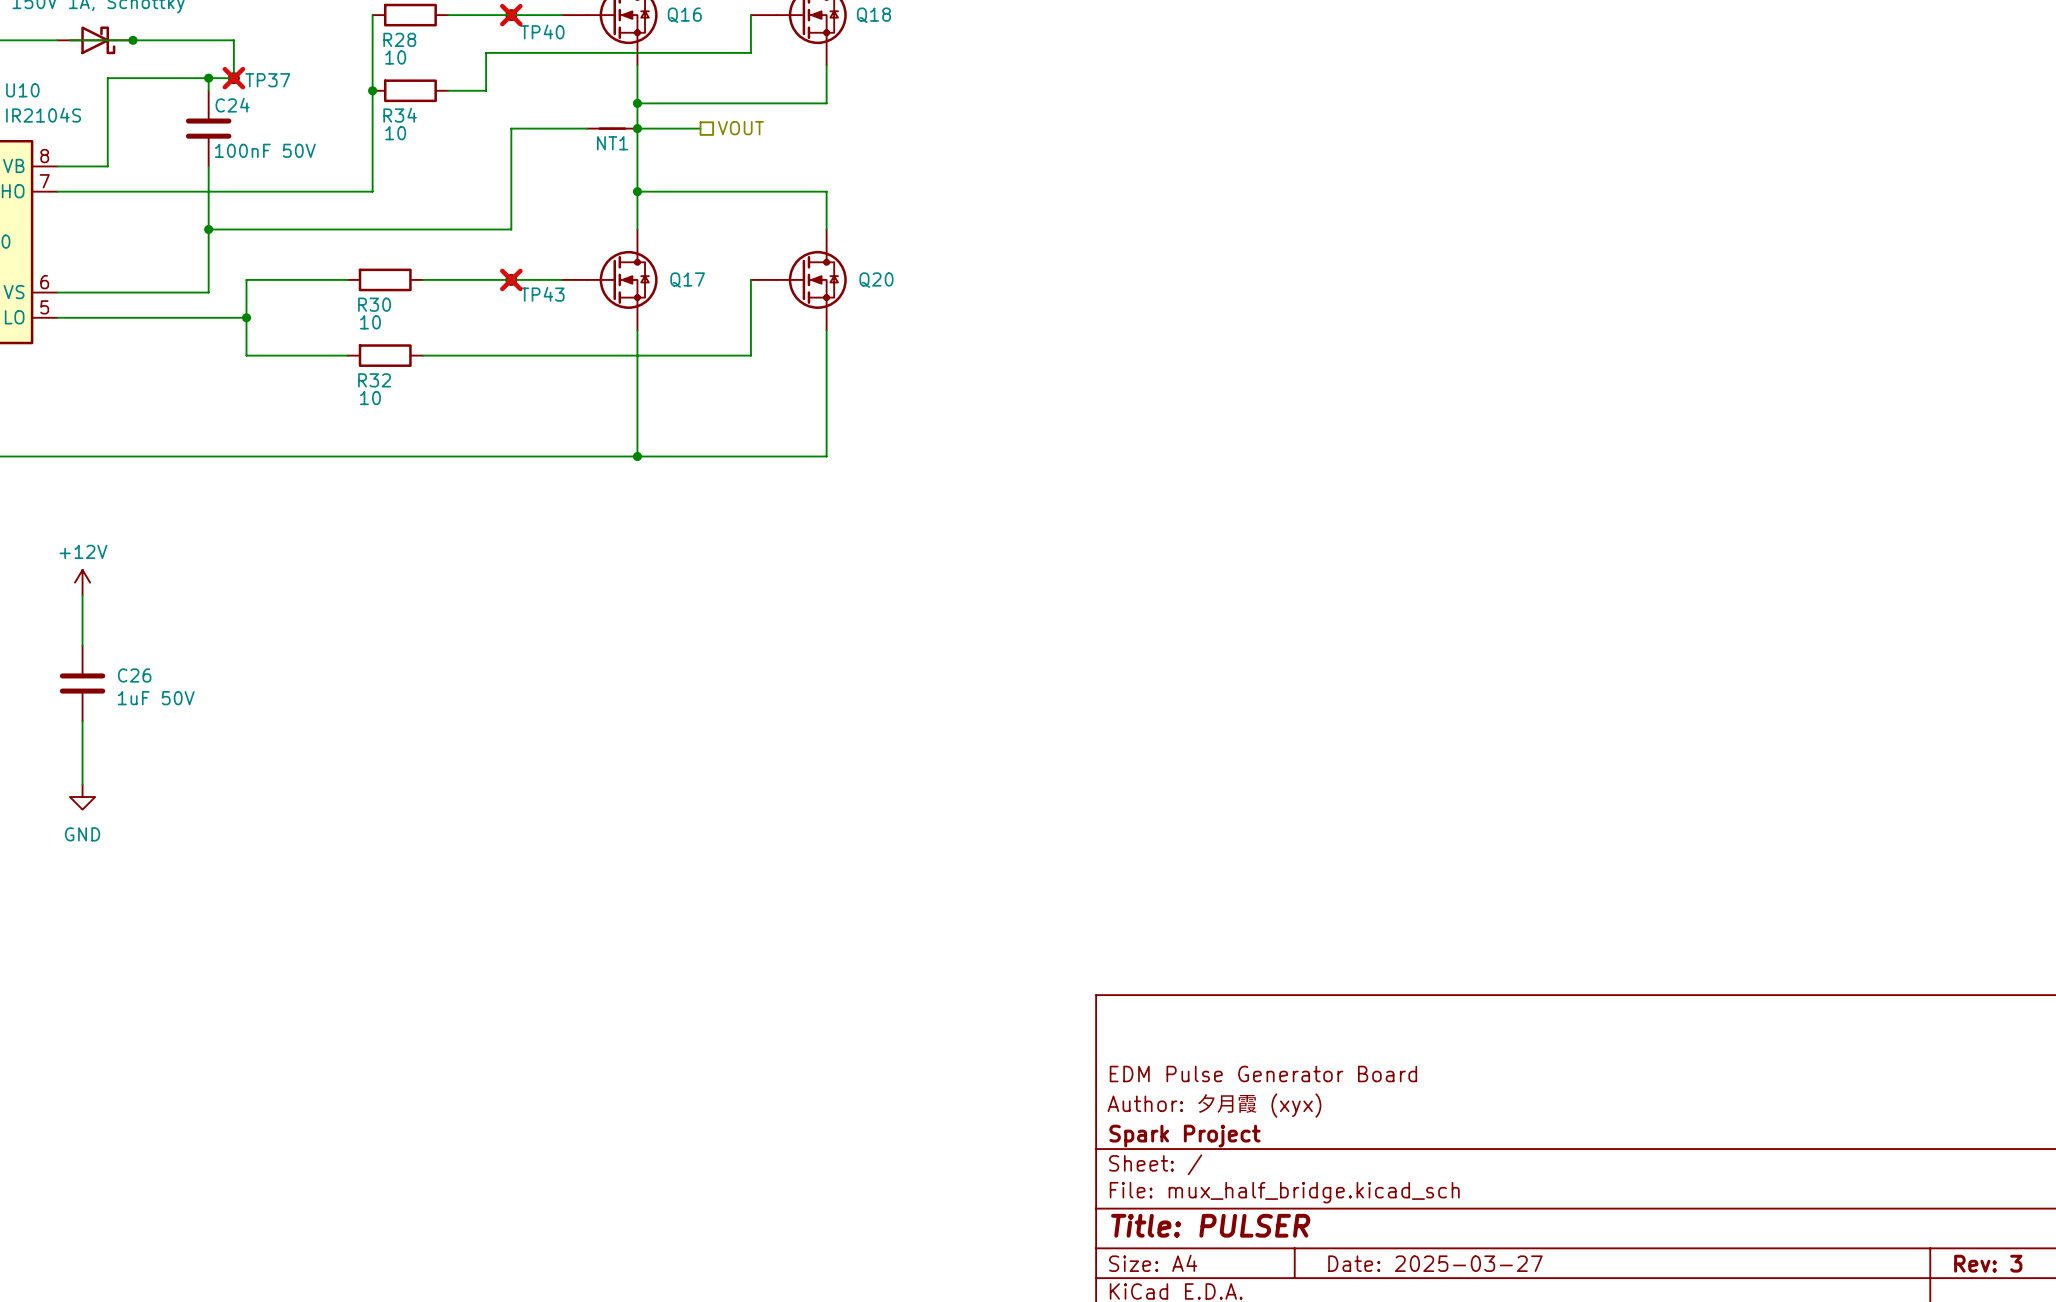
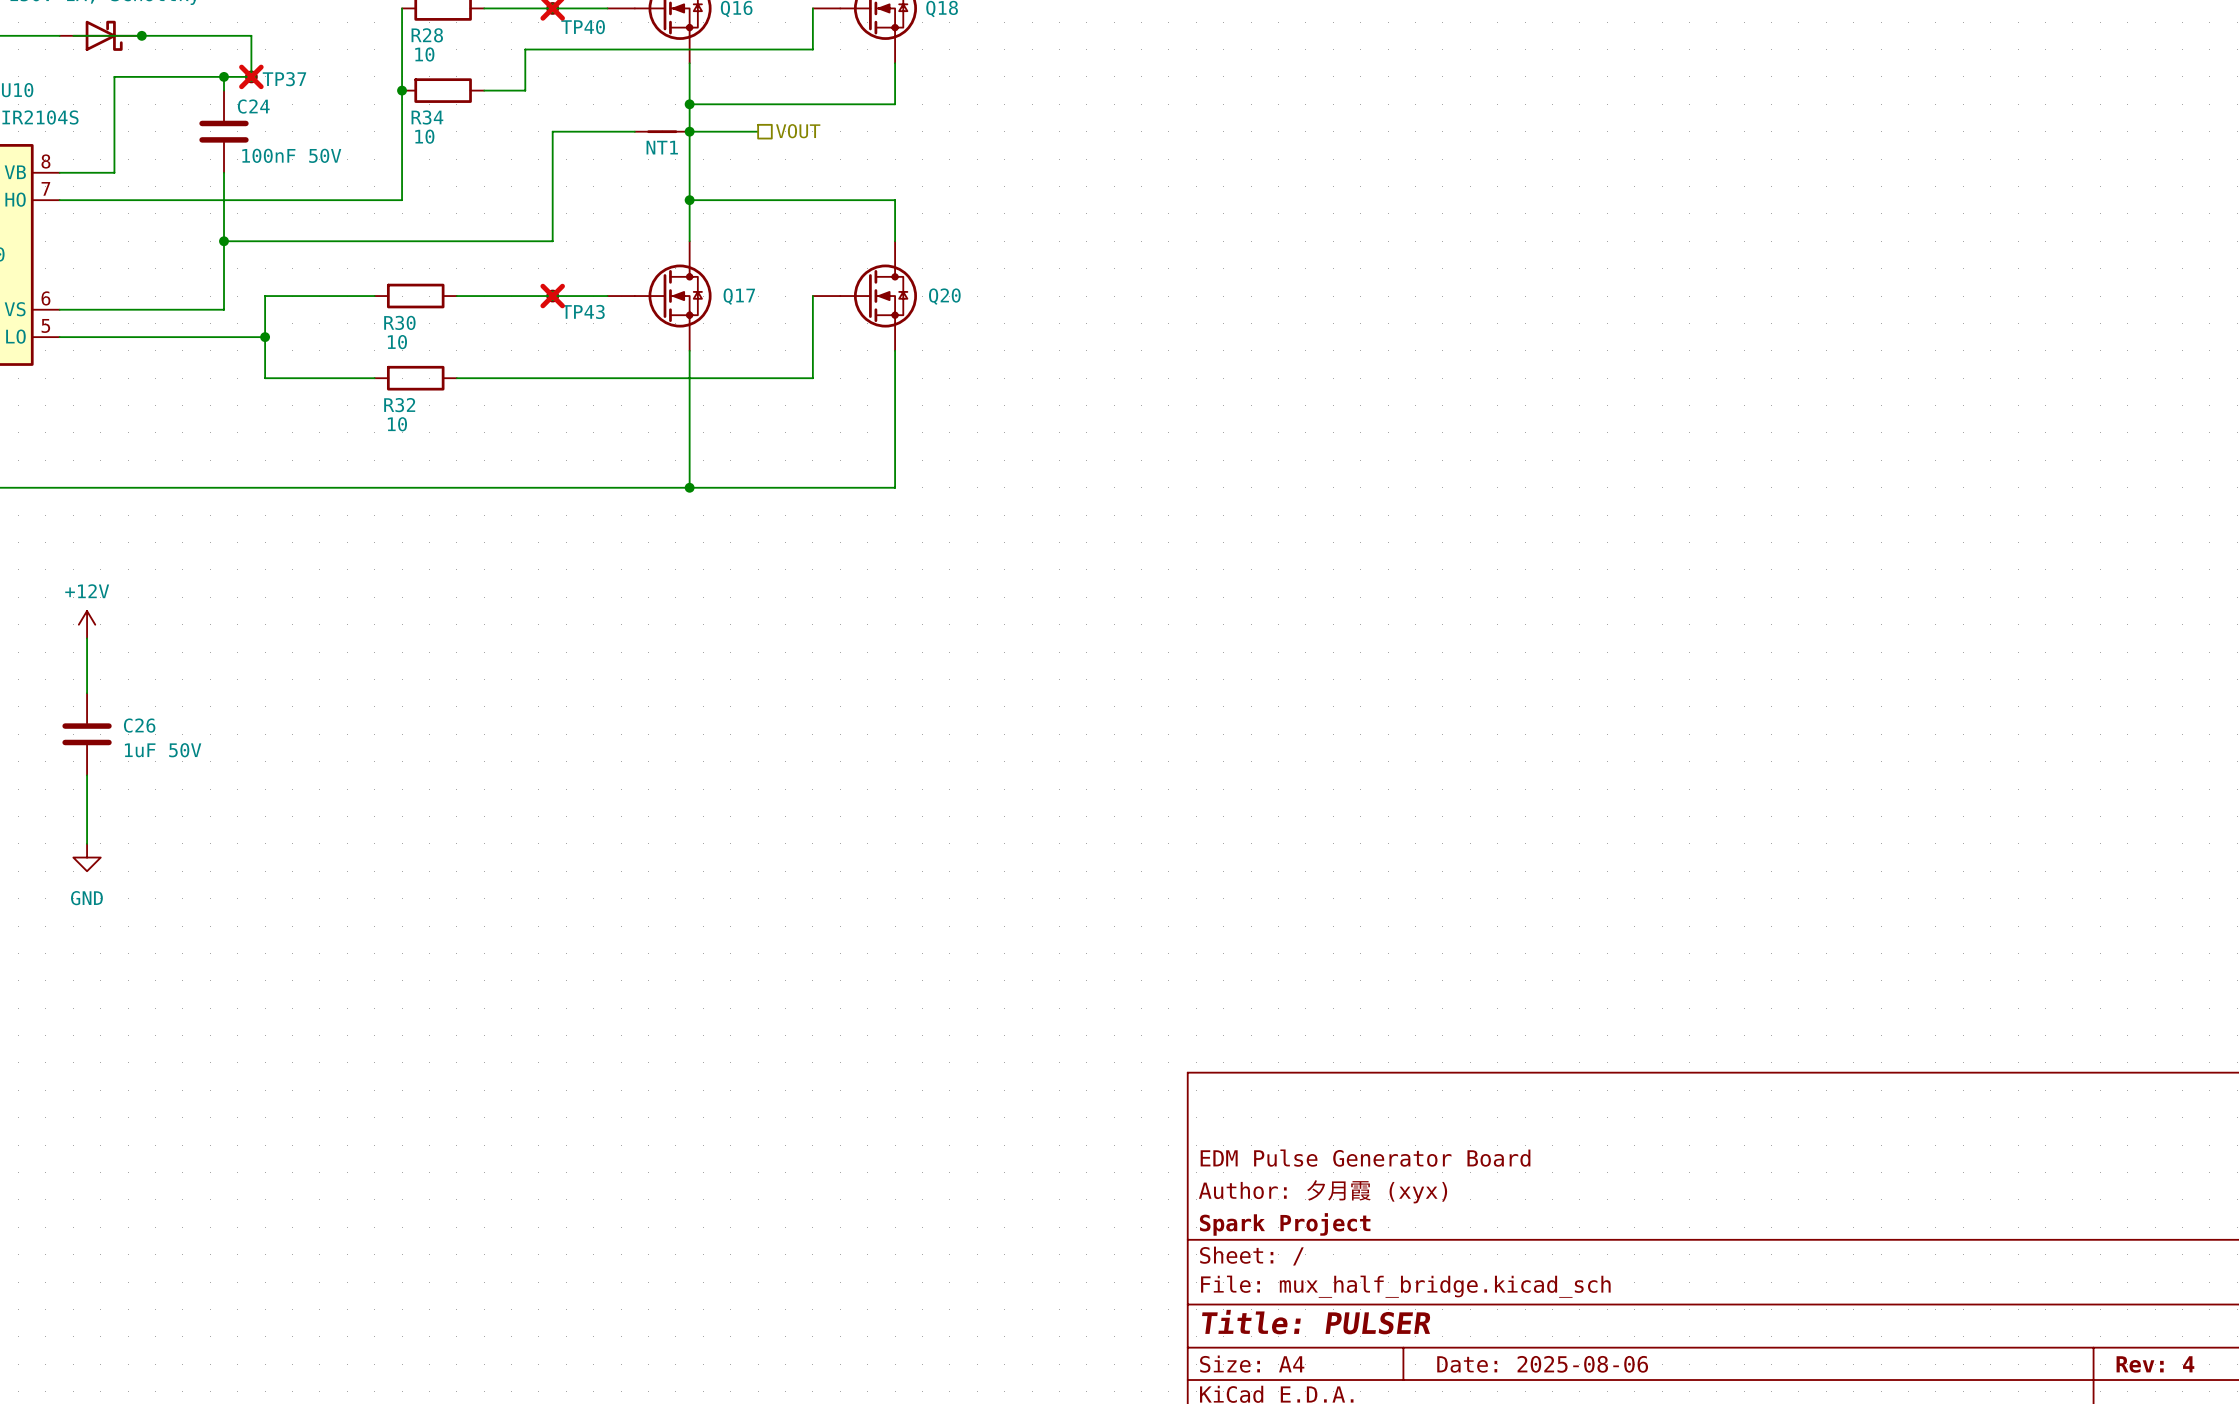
title block: Date: 2025-03-27 (1435, 1263) -> Date: 2025-08-06 (1542, 1364)
title block: Rev: 3 (1988, 1263) -> Rev: 4 (2155, 1364)

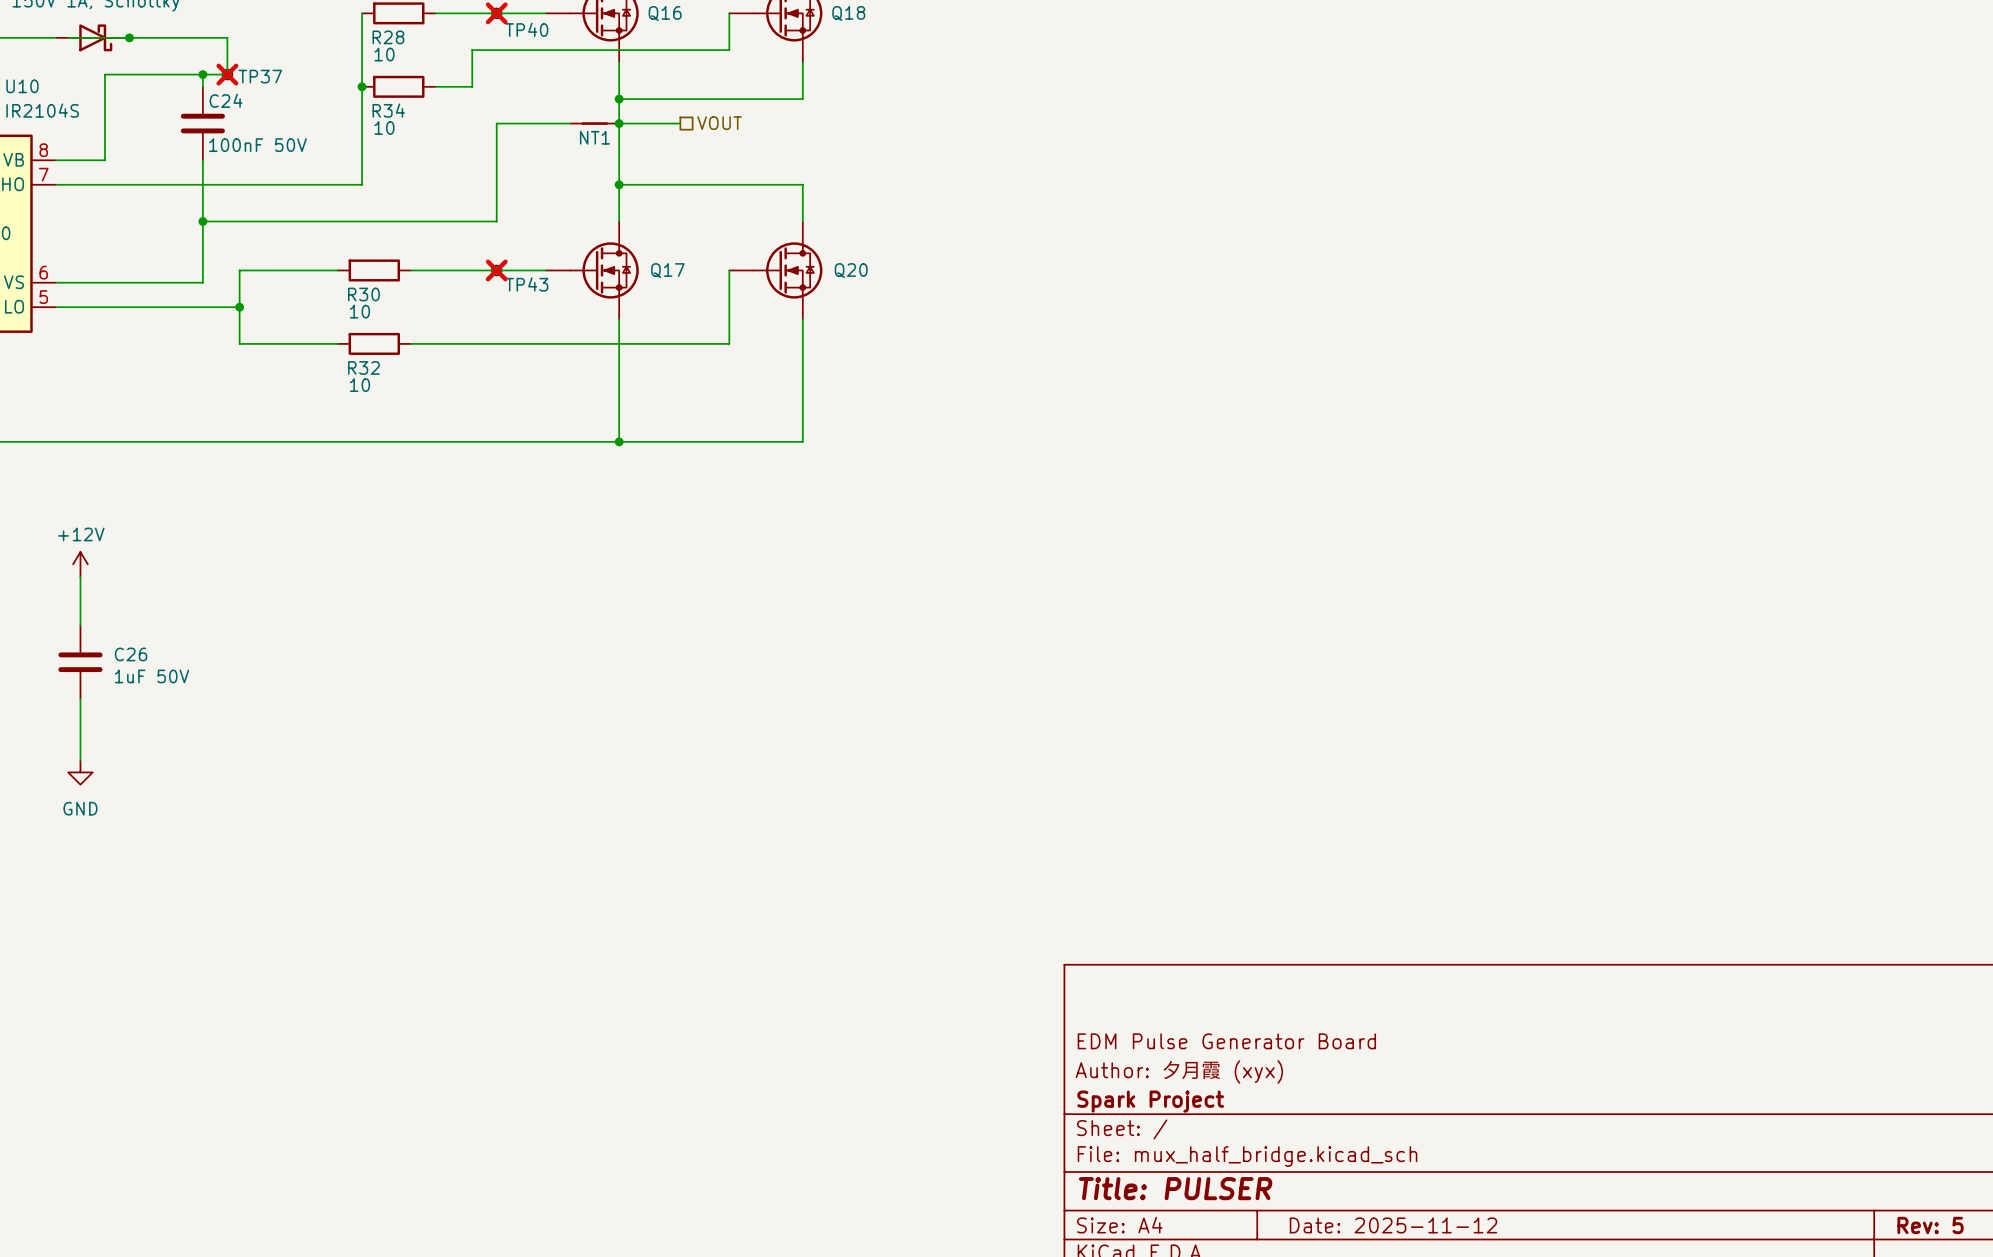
title block: Date: 2025-08-06 (1542, 1364) -> Date: 2025-11-12 (1393, 1225)
title block: Rev: 4 (2155, 1364) -> Rev: 5 (1930, 1225)

